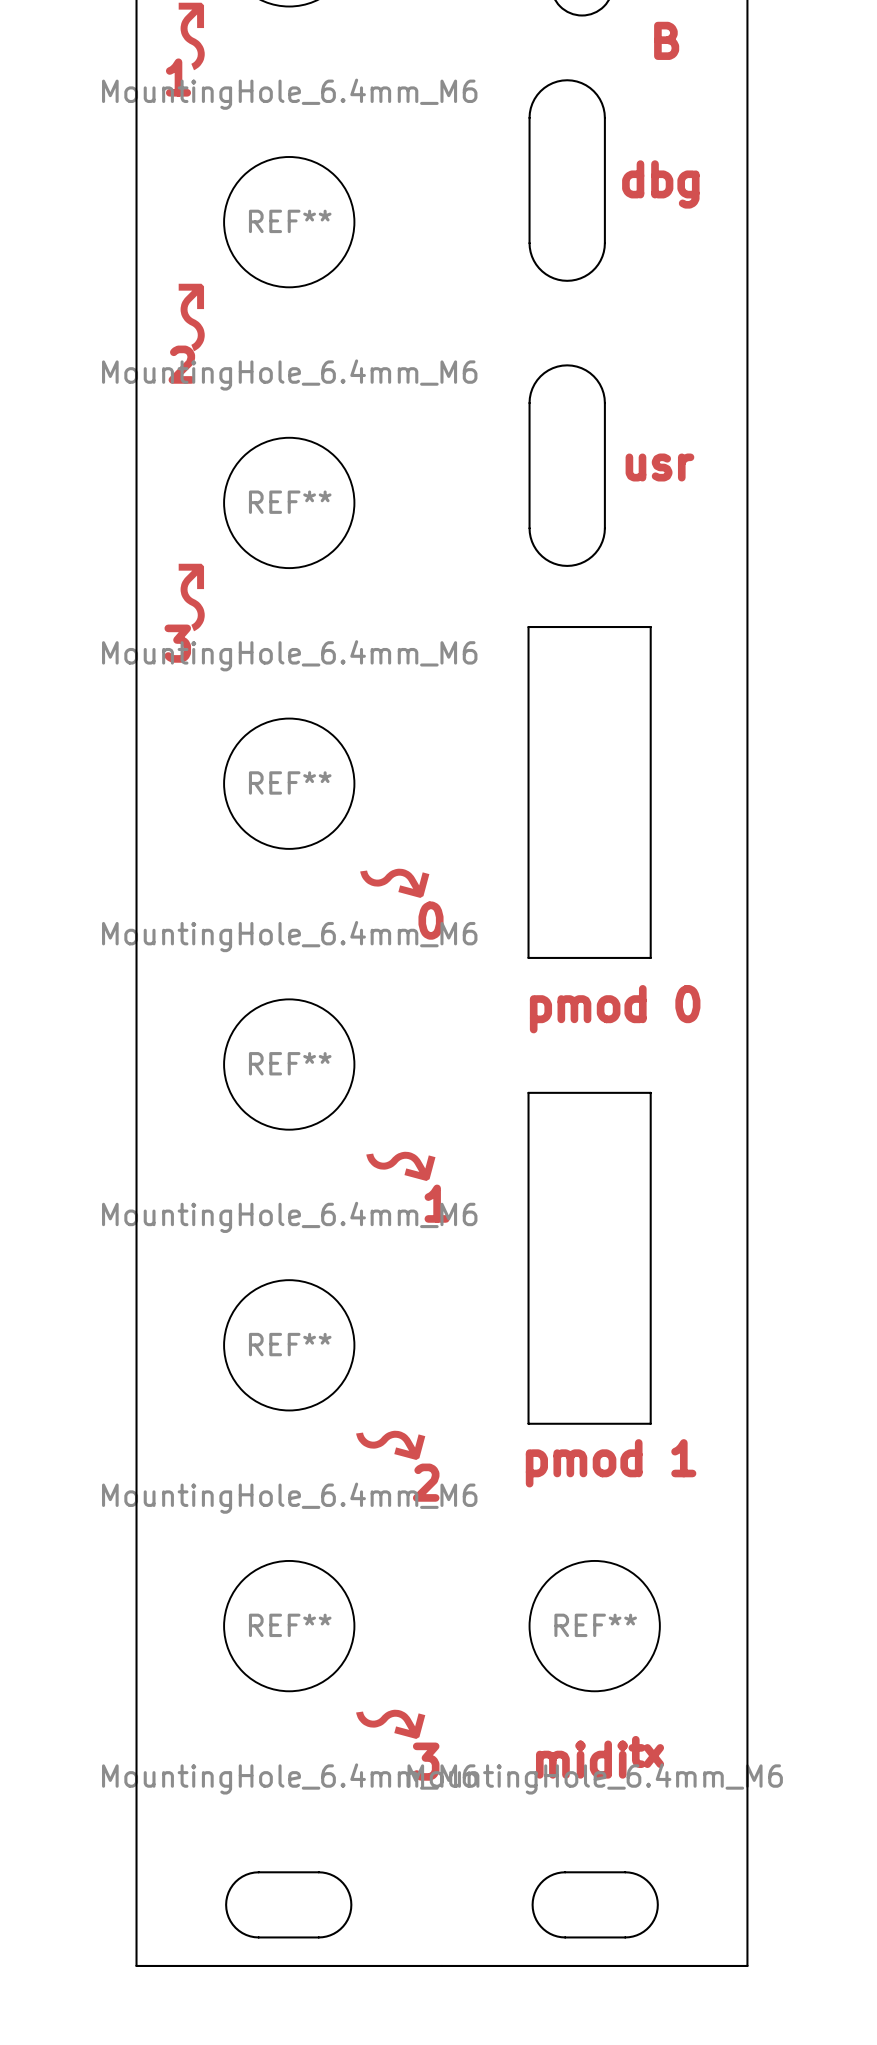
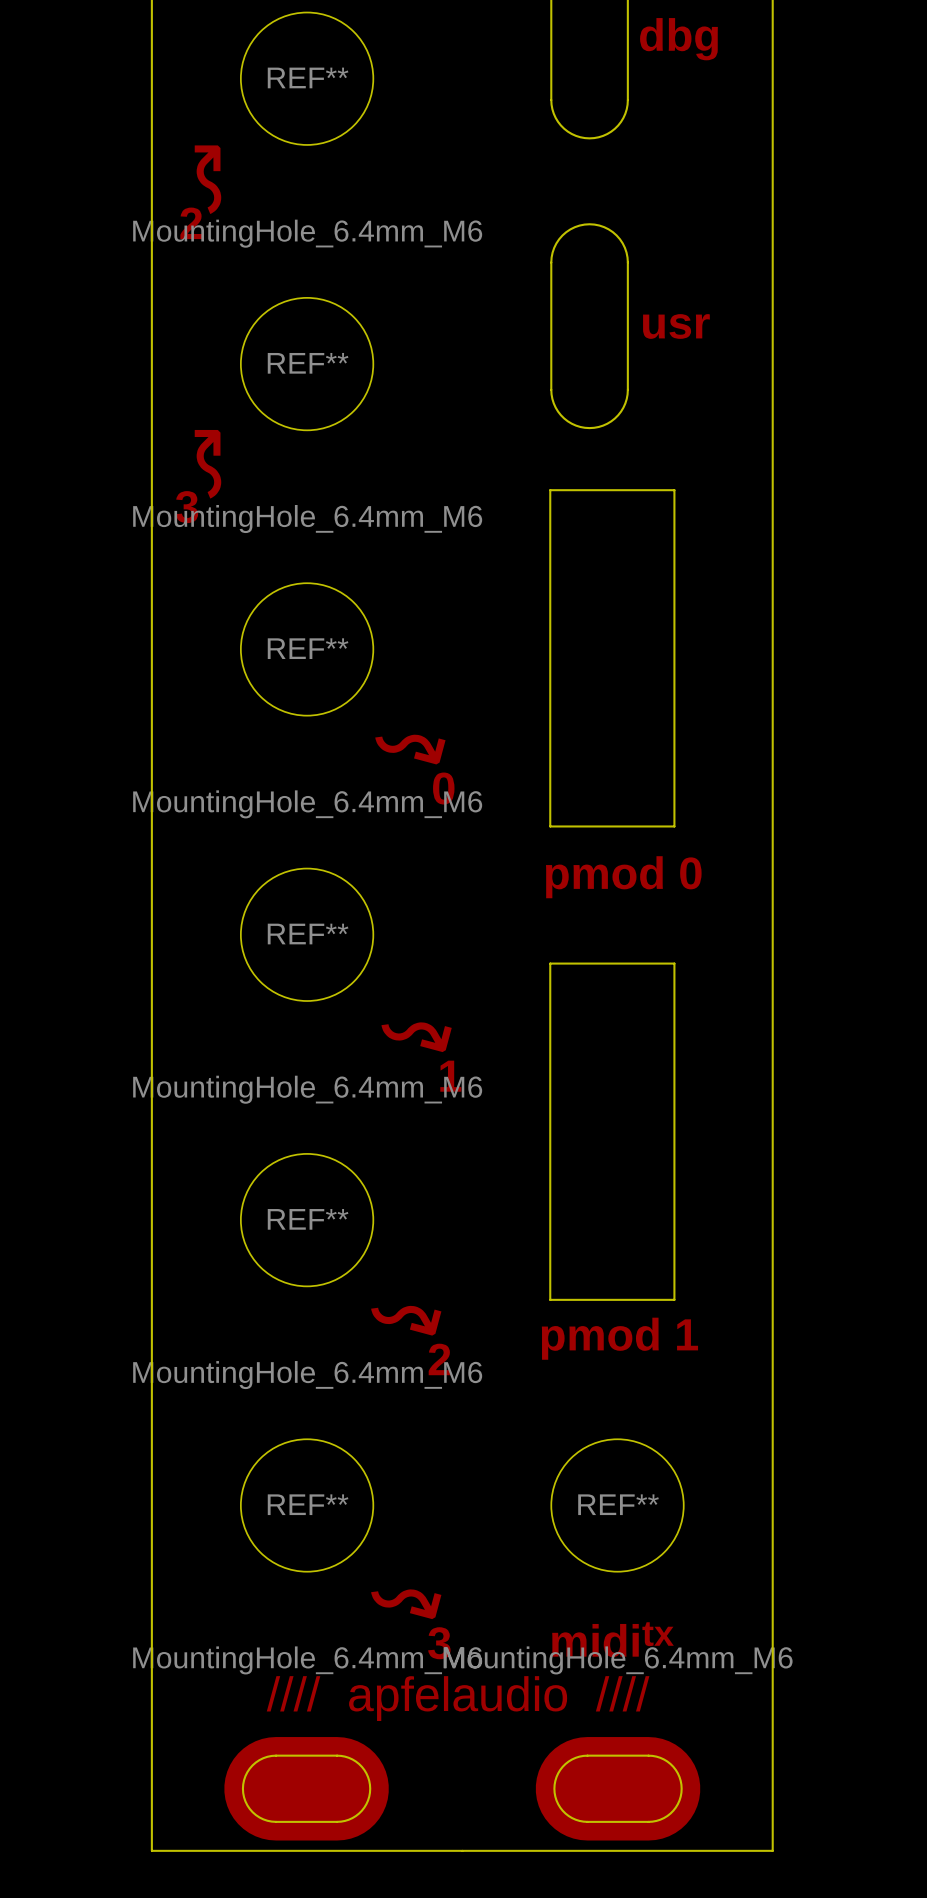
text: none -> //// apfelaudio //// (458, 1698)
top track: none -> (276, 1788) (337, 1788)
top track: none -> (587, 1788) (648, 1788)

